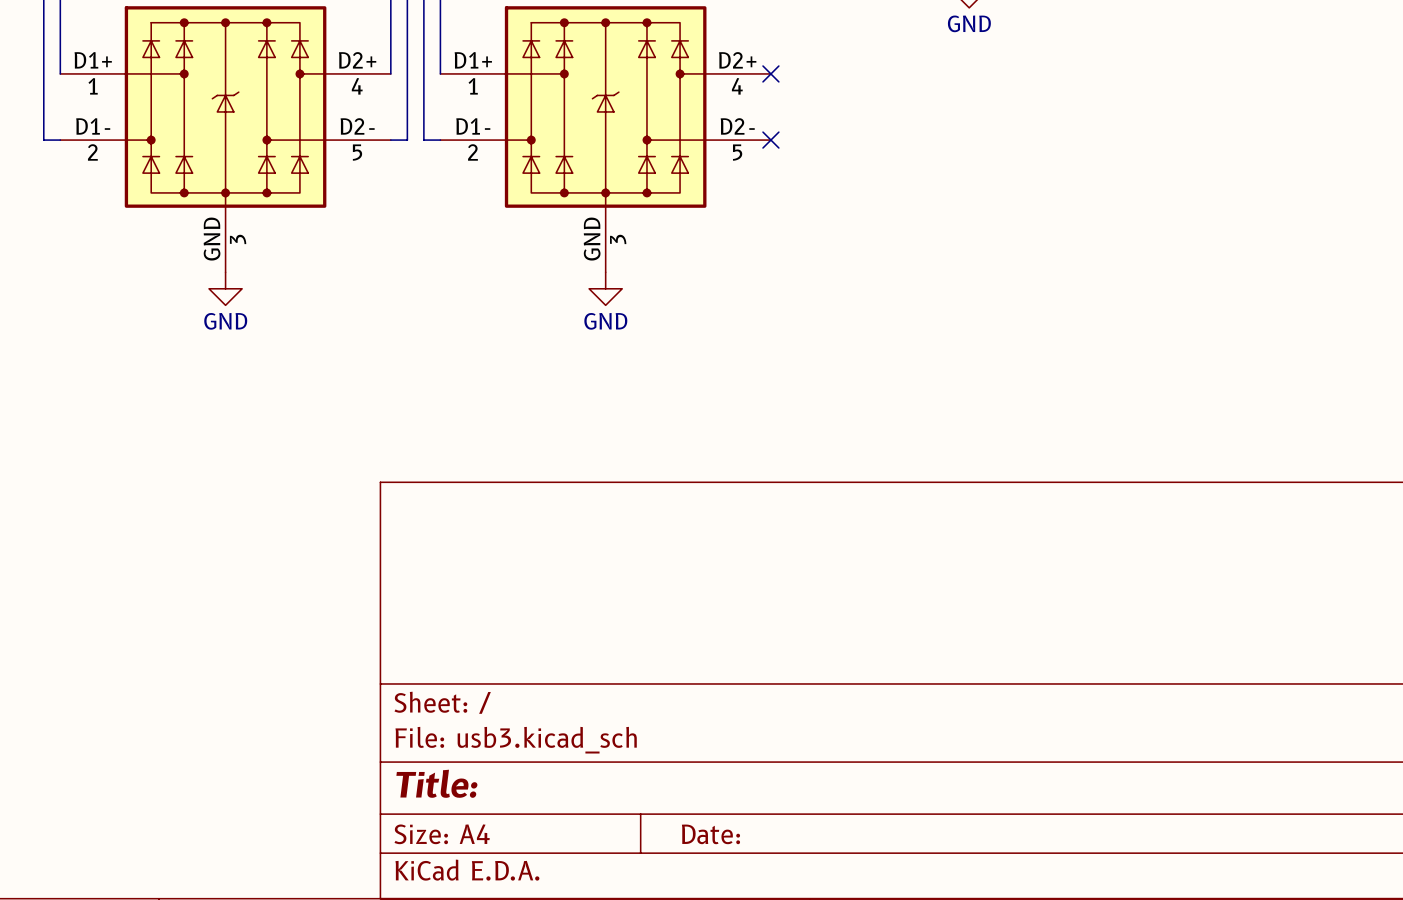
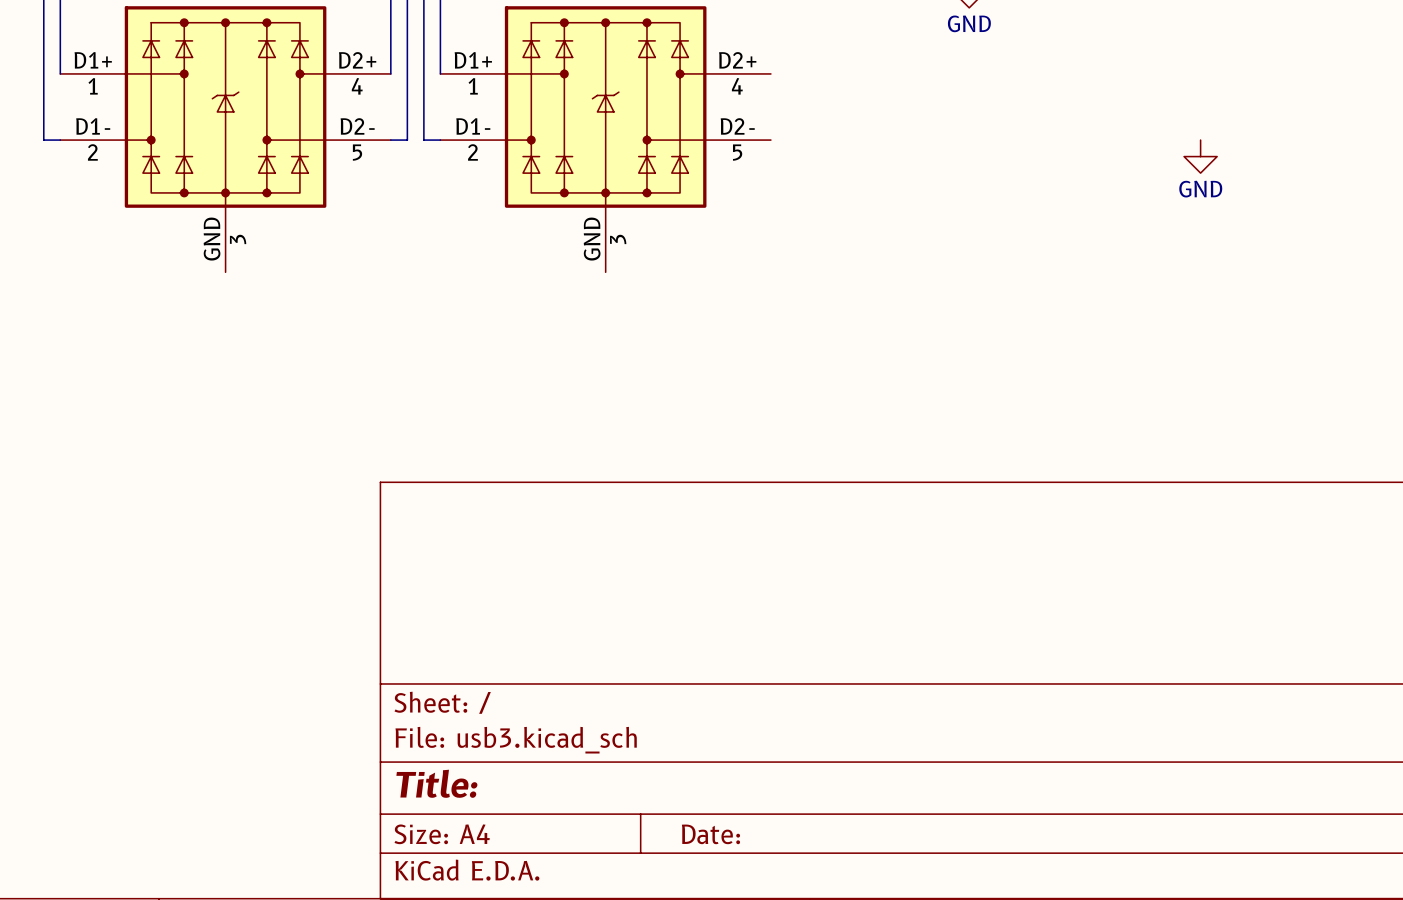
no-connect mark: (770, 73) -> none
no-connect mark: (770, 140) -> none
power symbol: none -> GND (1200, 156)
power symbol: GND (225, 288) -> none
power symbol: GND (605, 288) -> none

